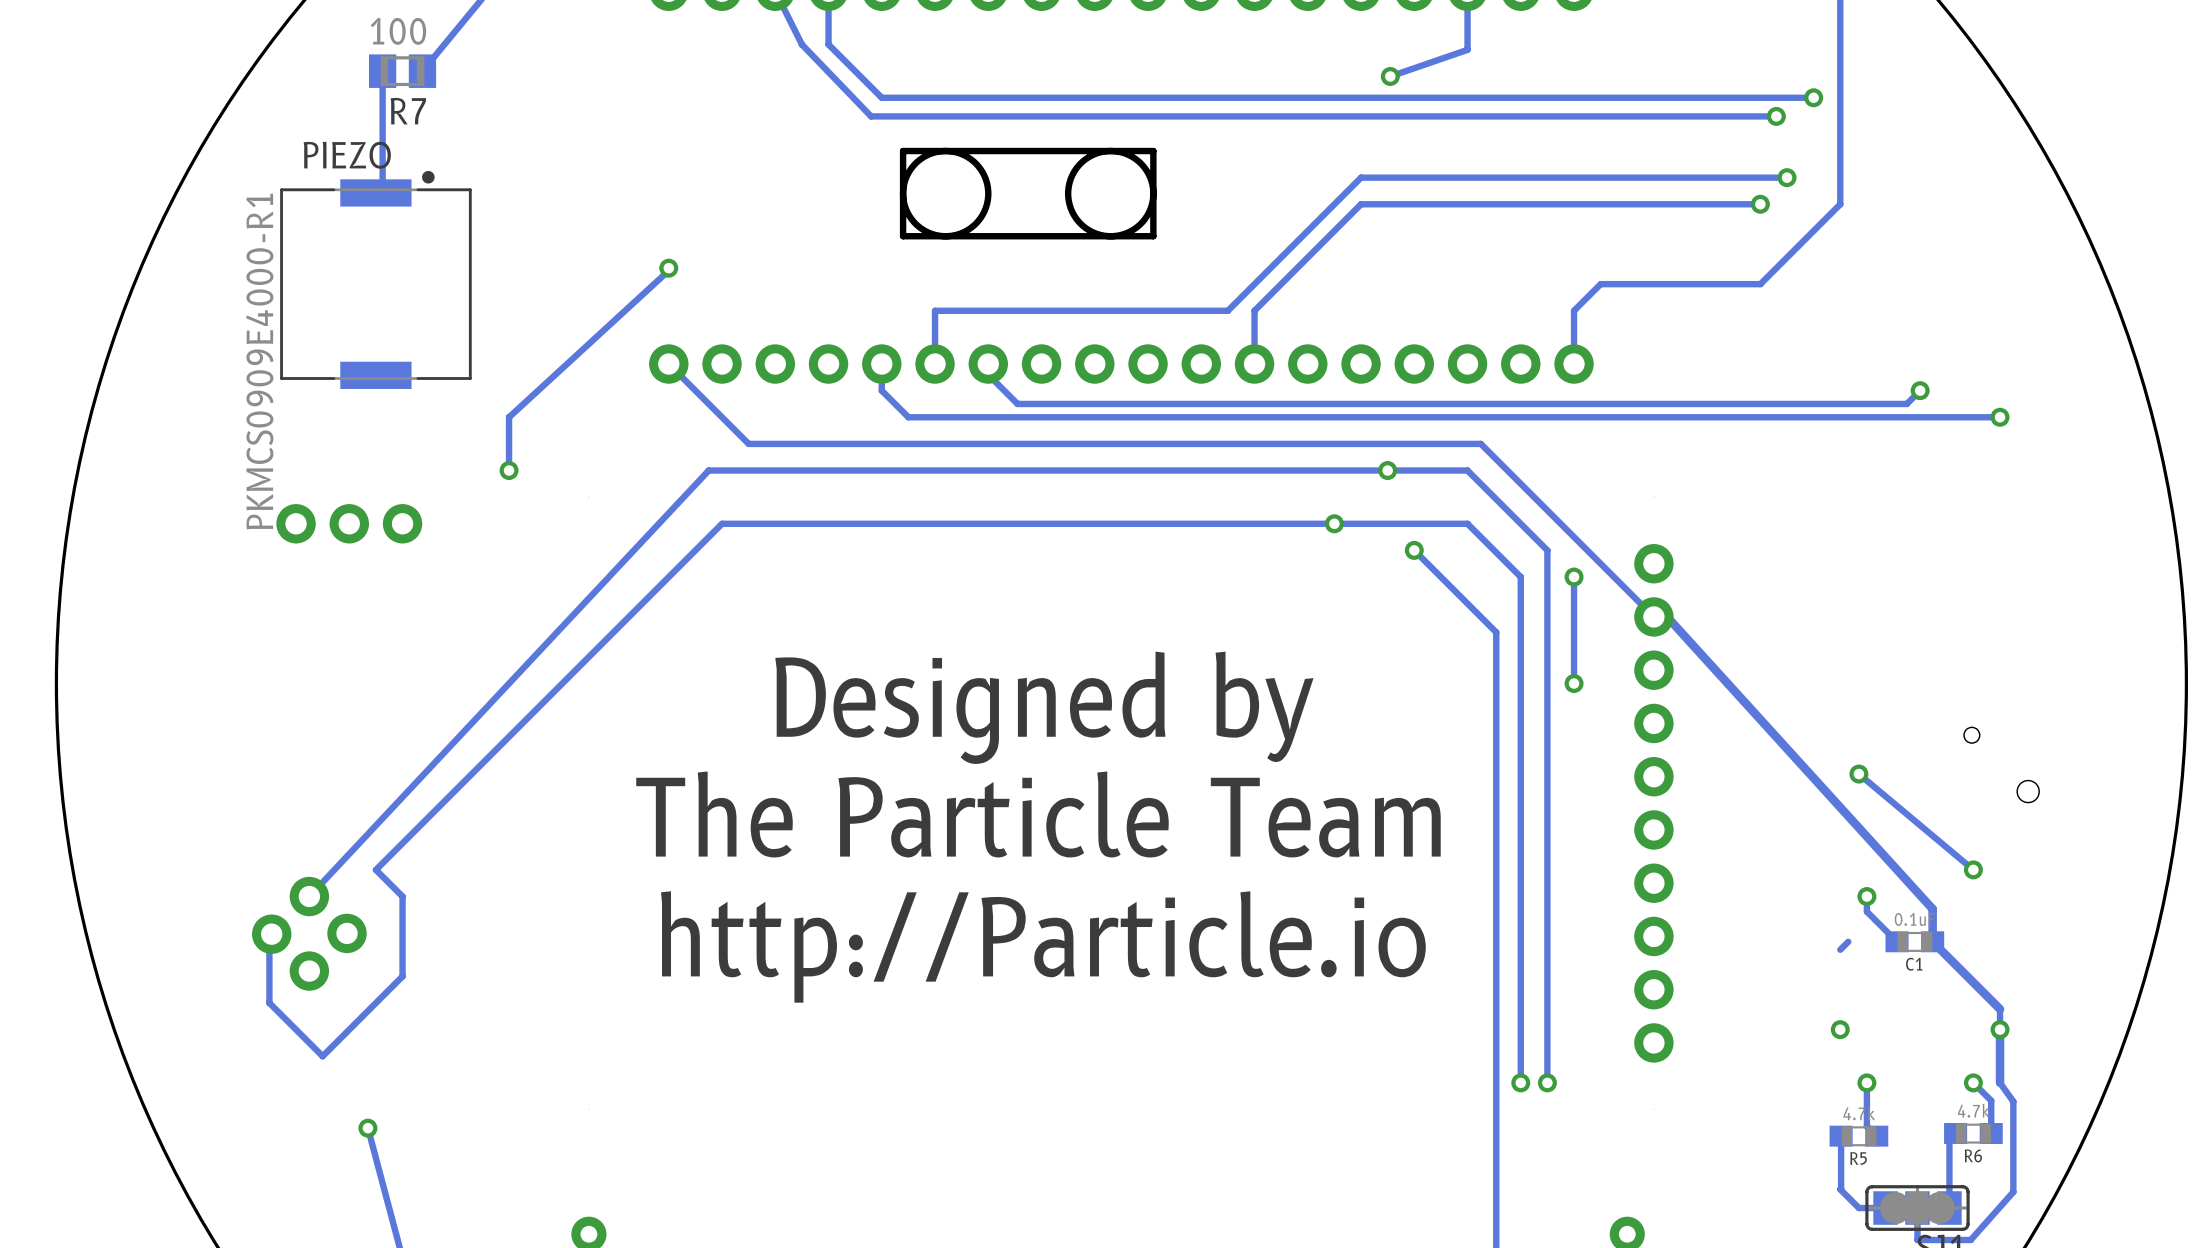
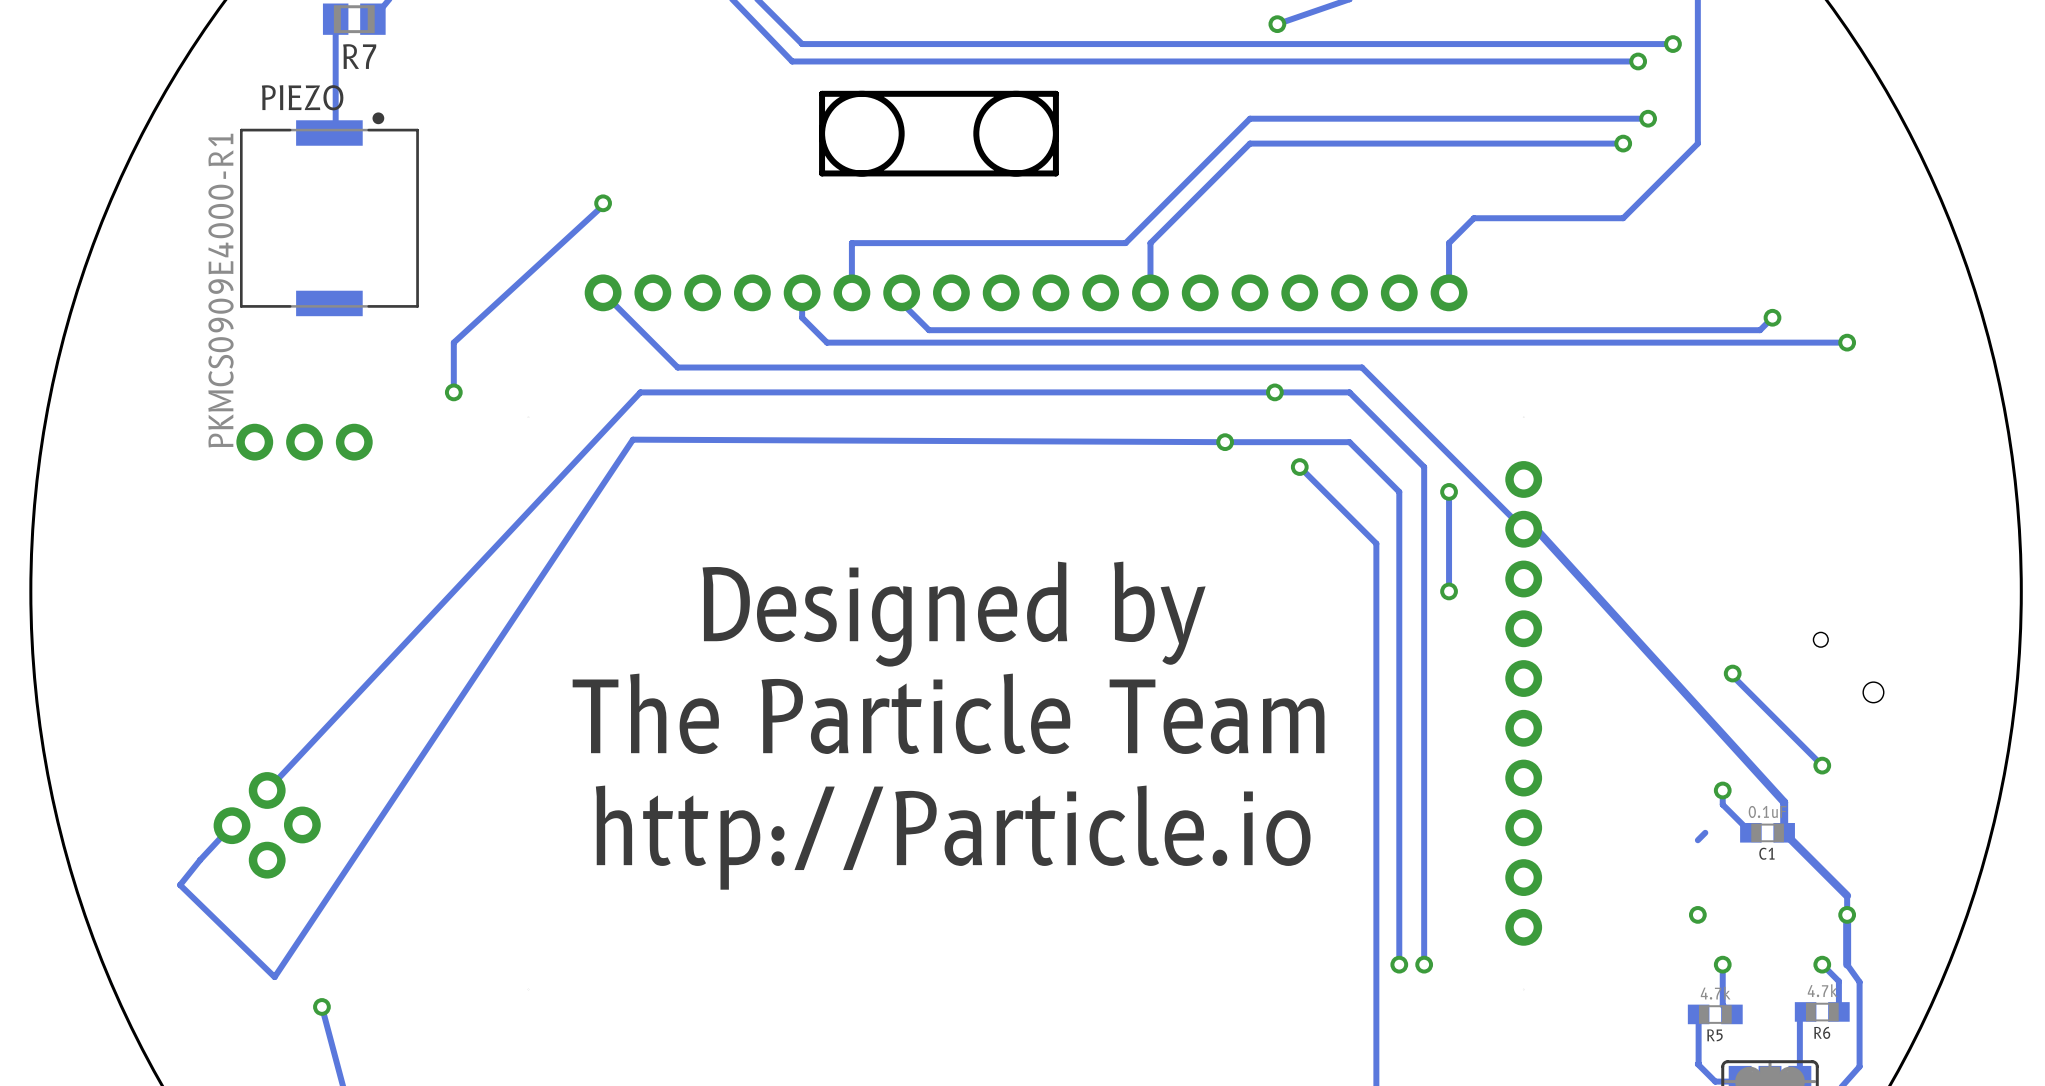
track: (1334, 523) (722, 523) (375, 869) (402, 896) (402, 976) (322, 1056) (269, 1003) (269, 936) (271, 934) -> (1225, 442) (632, 439) (274, 977) (180, 885) (232, 825)
track: (1858, 774) (1973, 869) -> (1732, 673) (1732, 676) (1822, 765)
via position: (1858, 774) -> (1732, 673)

